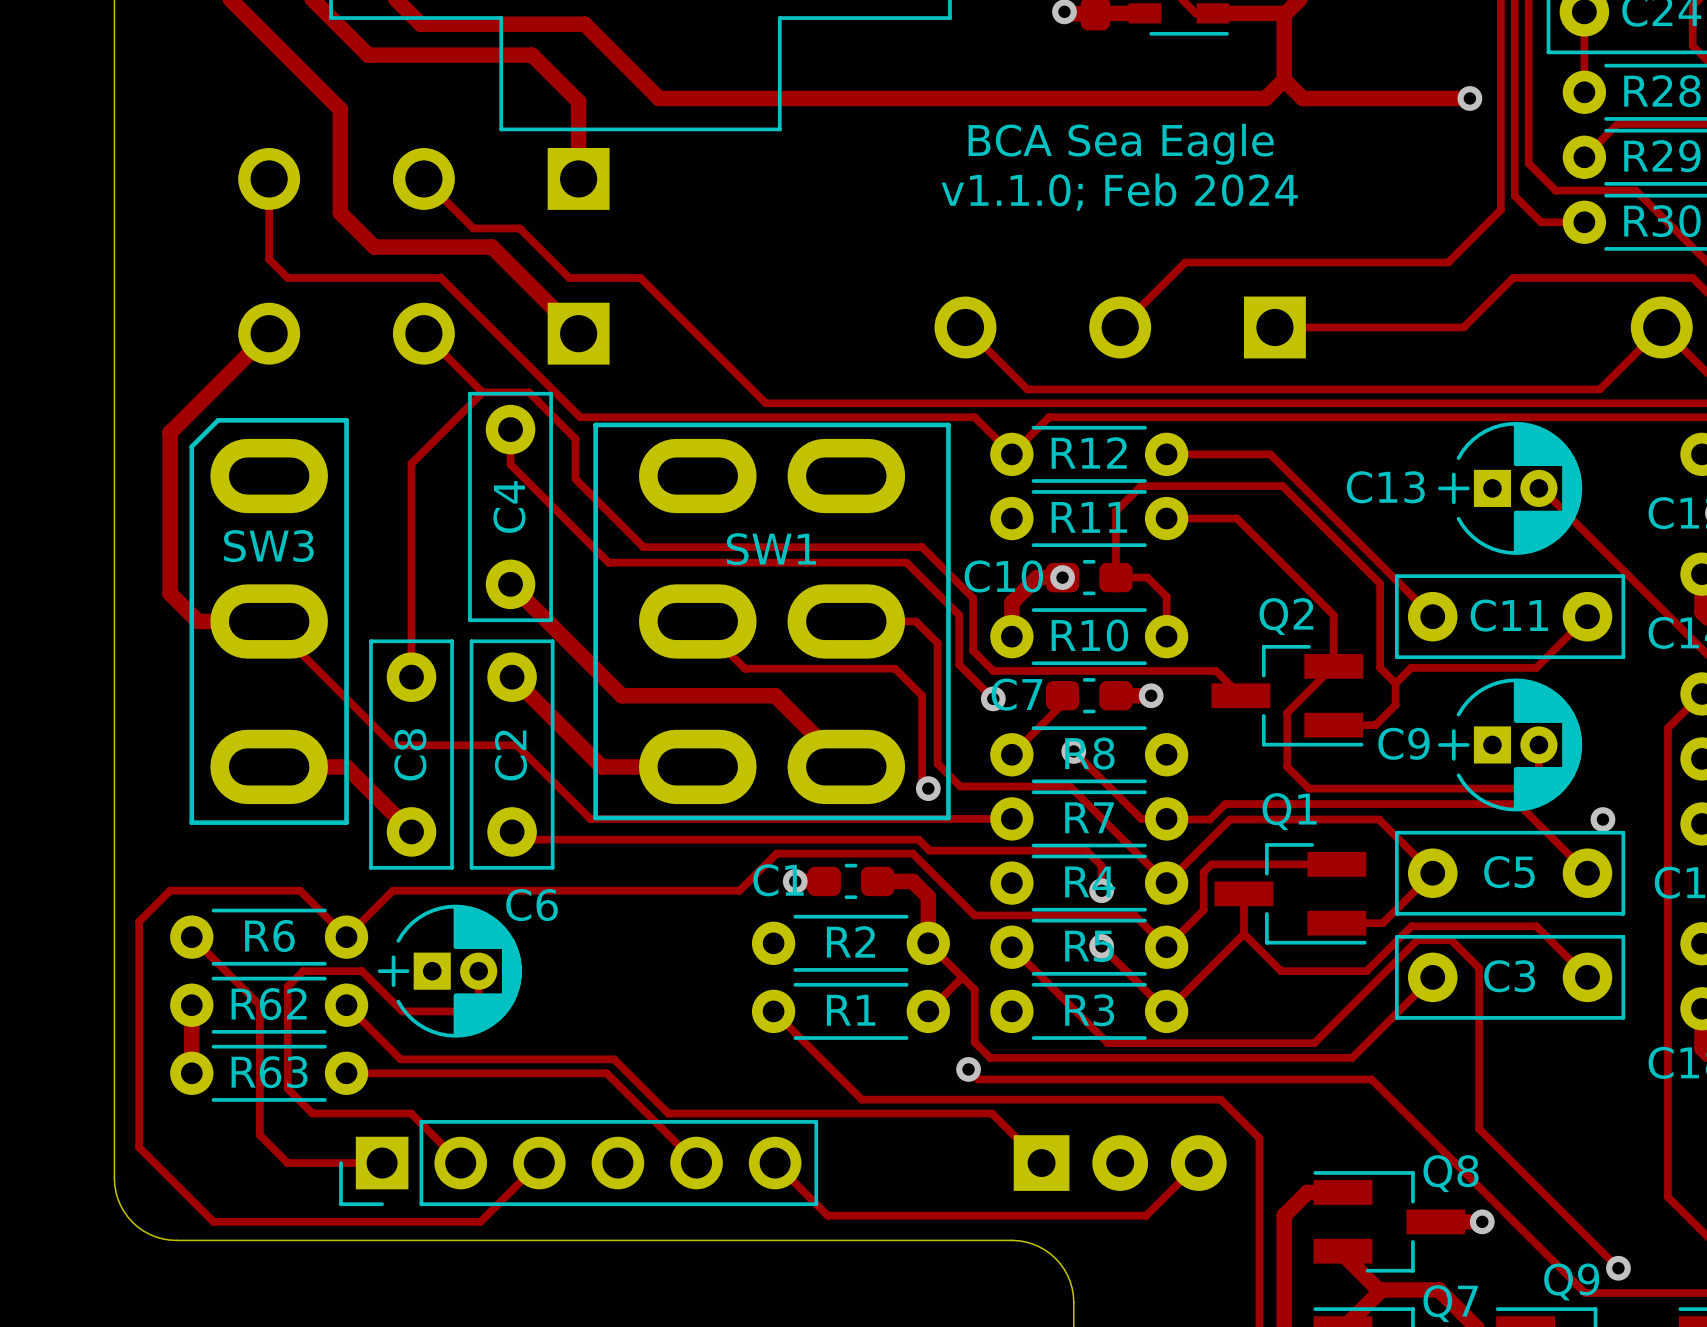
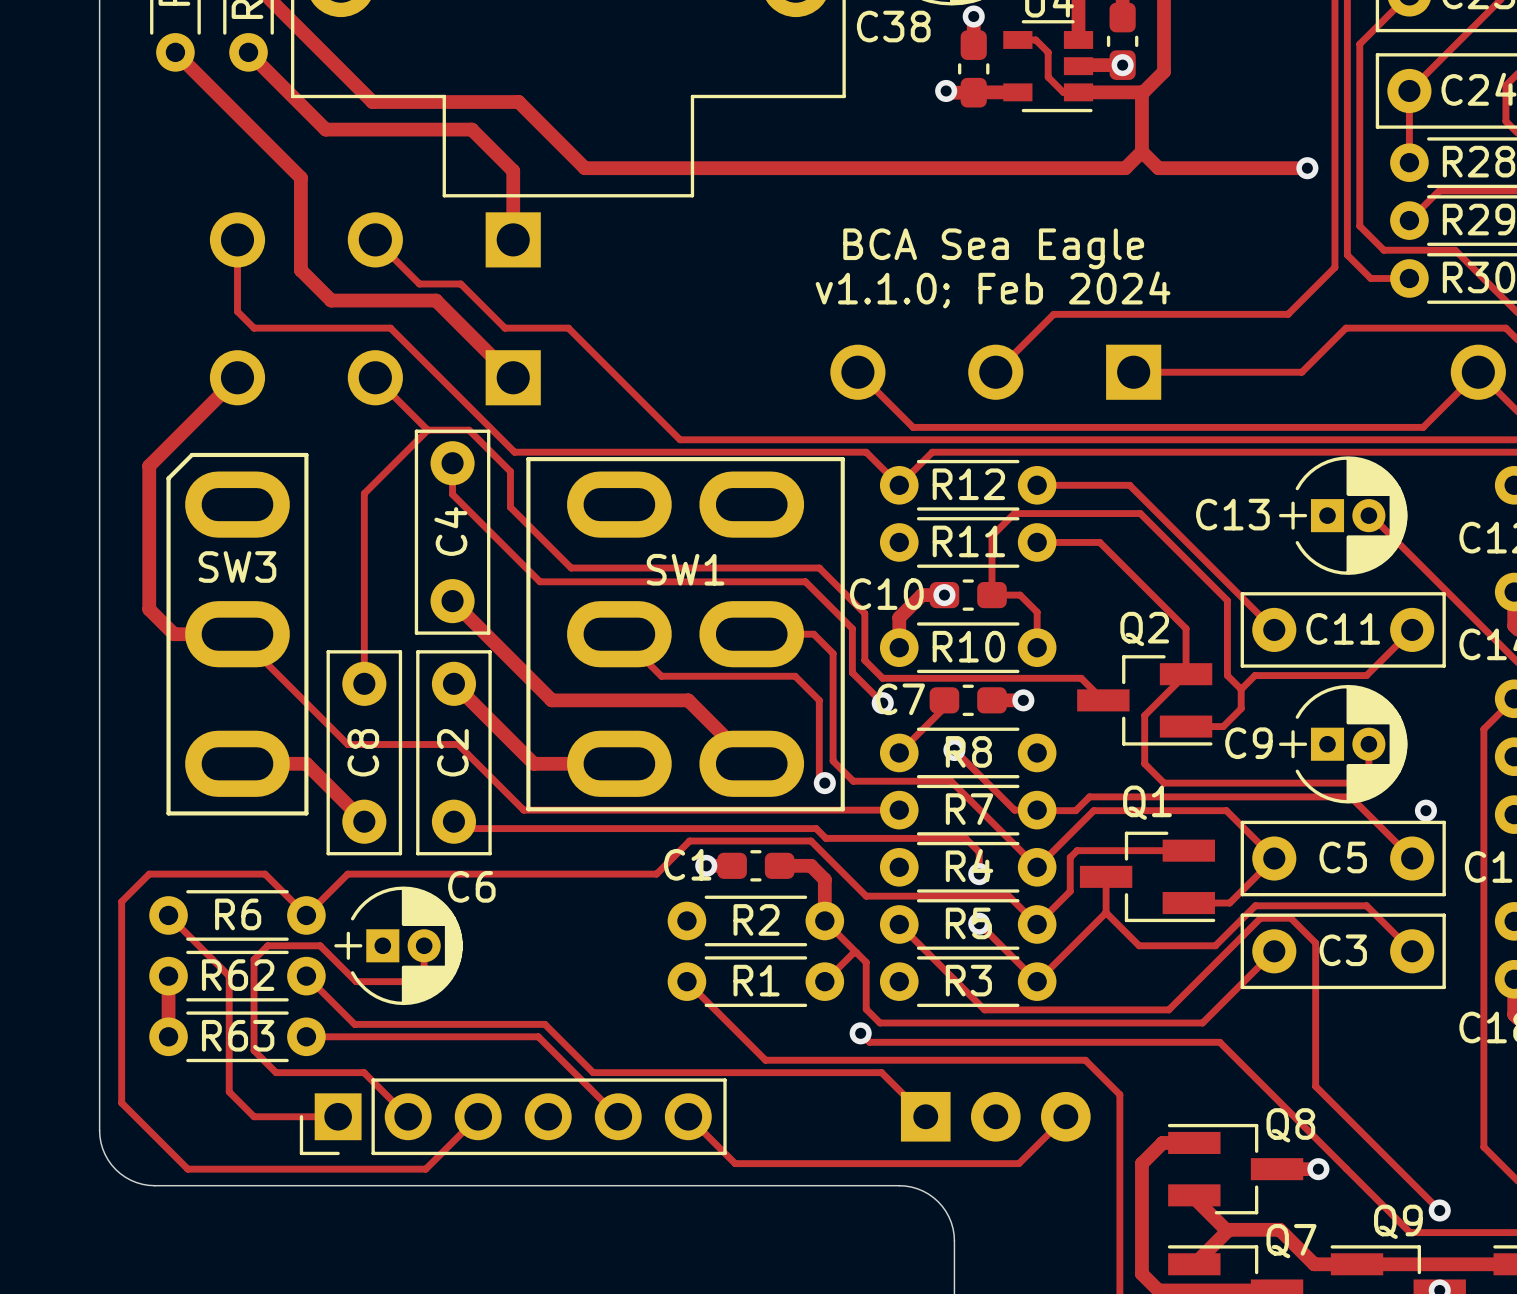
text position: BCA Sea Eagle (1121, 144) -> BCA Sea Eagle (993, 248)
text position: v1.1.0; Feb 2024 (1119, 192) -> v1.1.0; Feb 2024 (993, 289)

